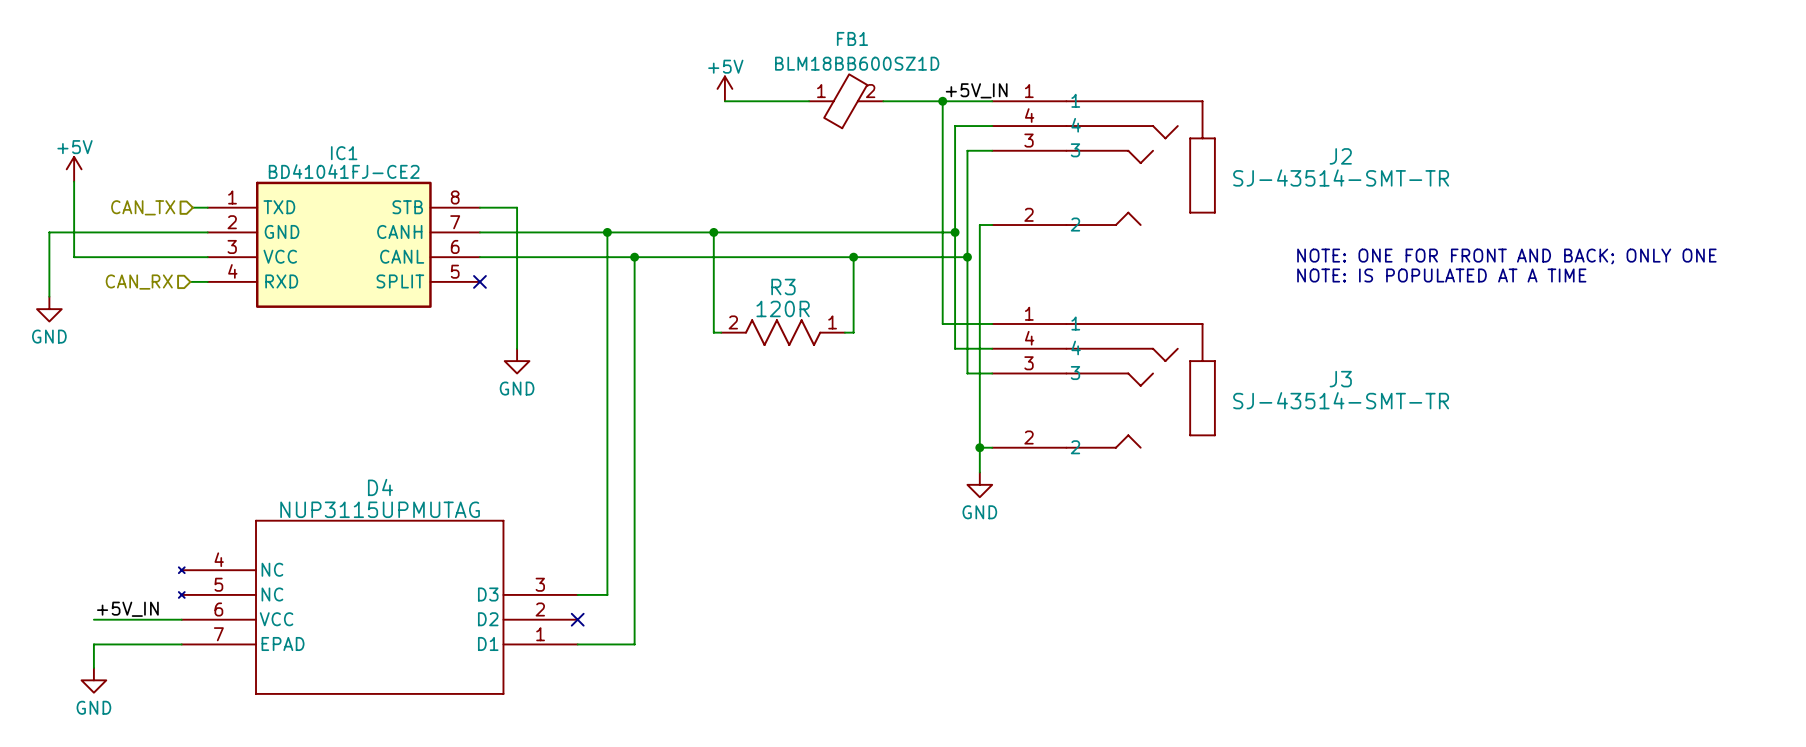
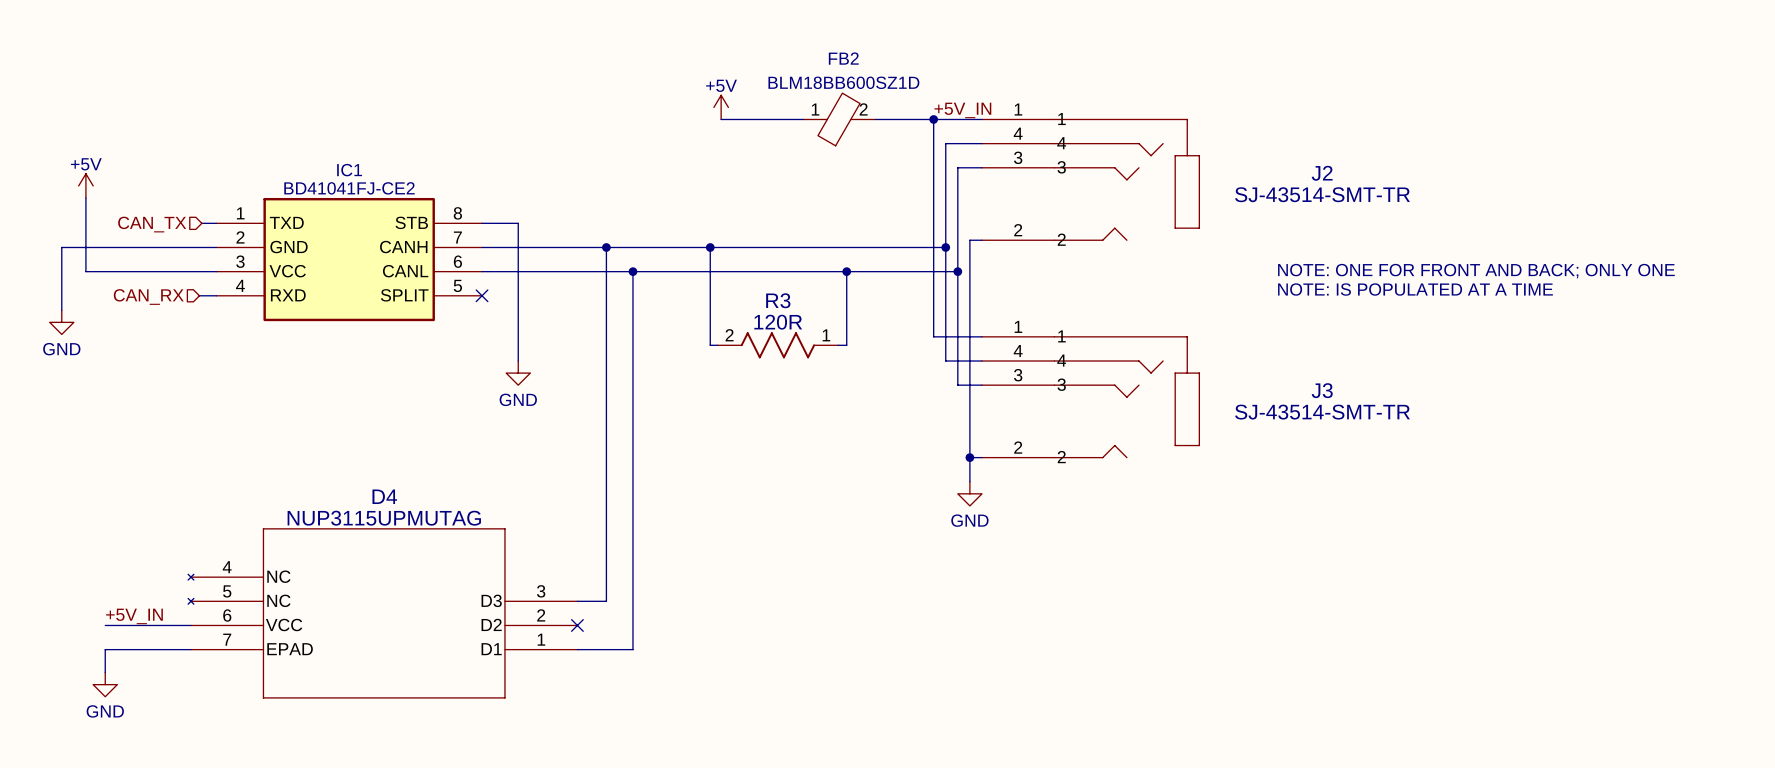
FB1 name: FB1 (852, 38) -> FB2 (843, 58)

